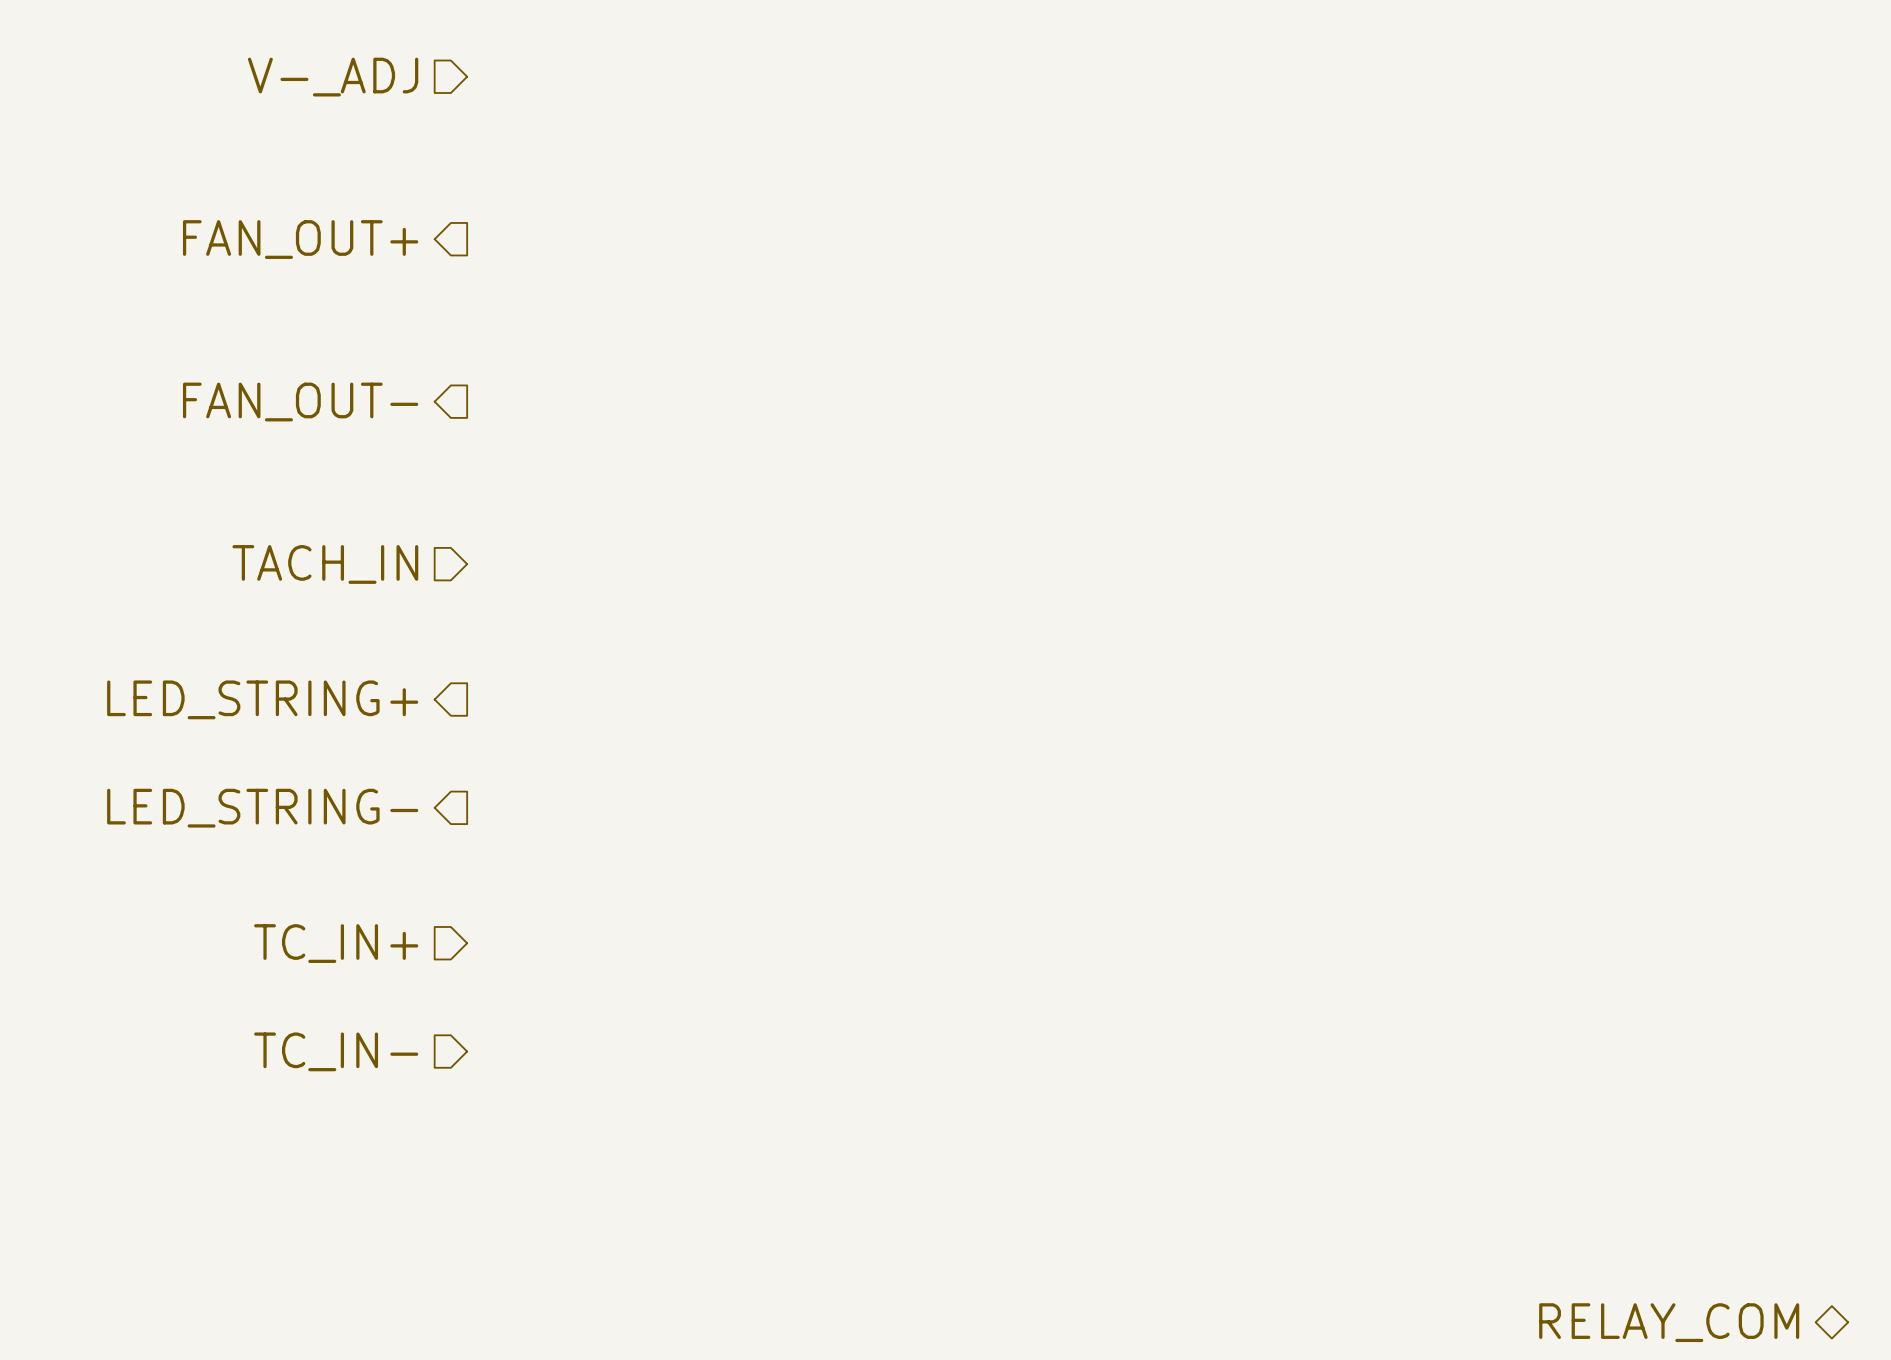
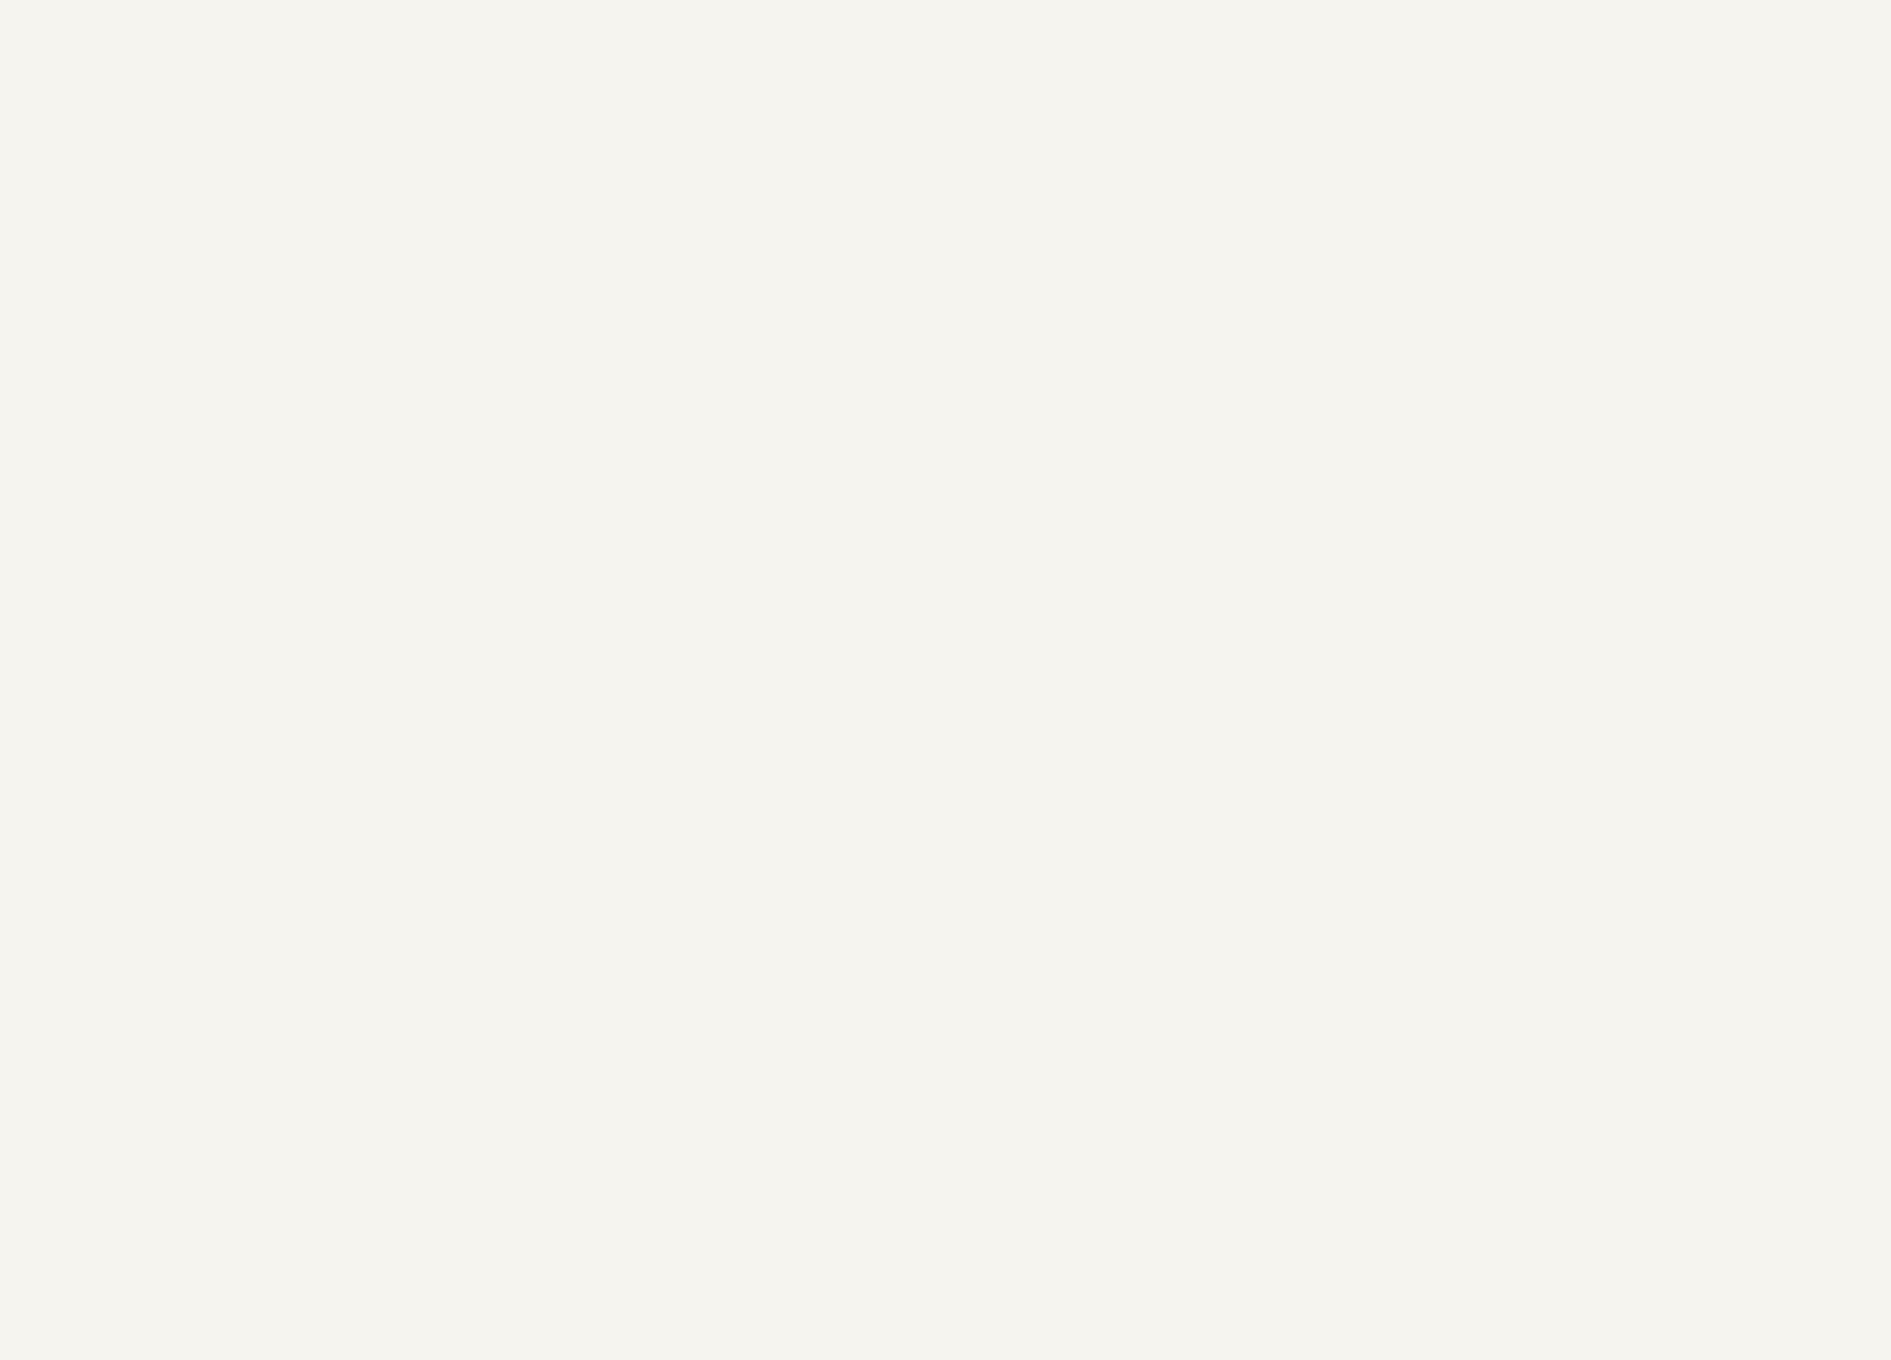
hierarchical label: V-_ADJ (333, 77) -> none
hierarchical label: FAN_OUT+ (300, 239) -> none
hierarchical label: FAN_OUT- (300, 402) -> none
hierarchical label: TACH_IN (325, 564) -> none
hierarchical label: LED_STRING+ (262, 699) -> none
hierarchical label: LED_STRING- (262, 808) -> none
hierarchical label: TC_IN+ (336, 943) -> none
hierarchical label: TC_IN- (336, 1051) -> none
hierarchical label: RELAY_COM (1669, 1322) -> none

